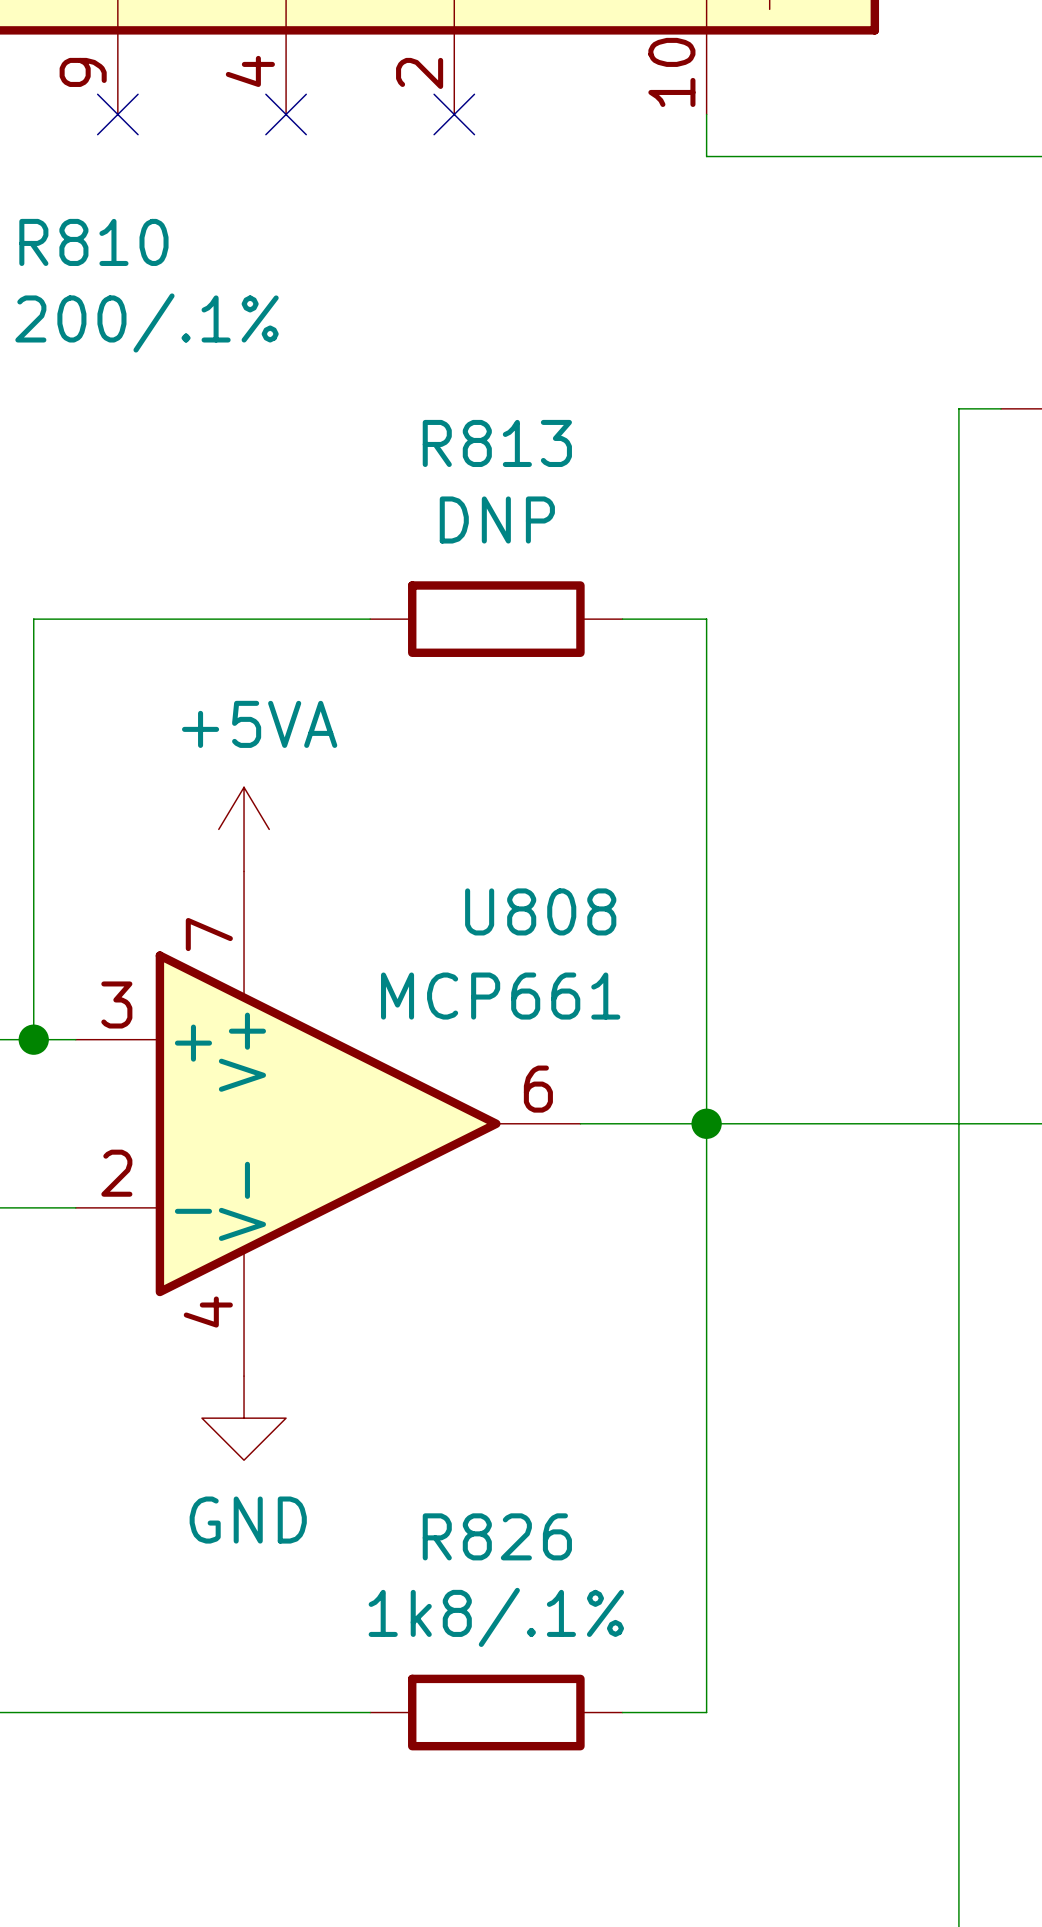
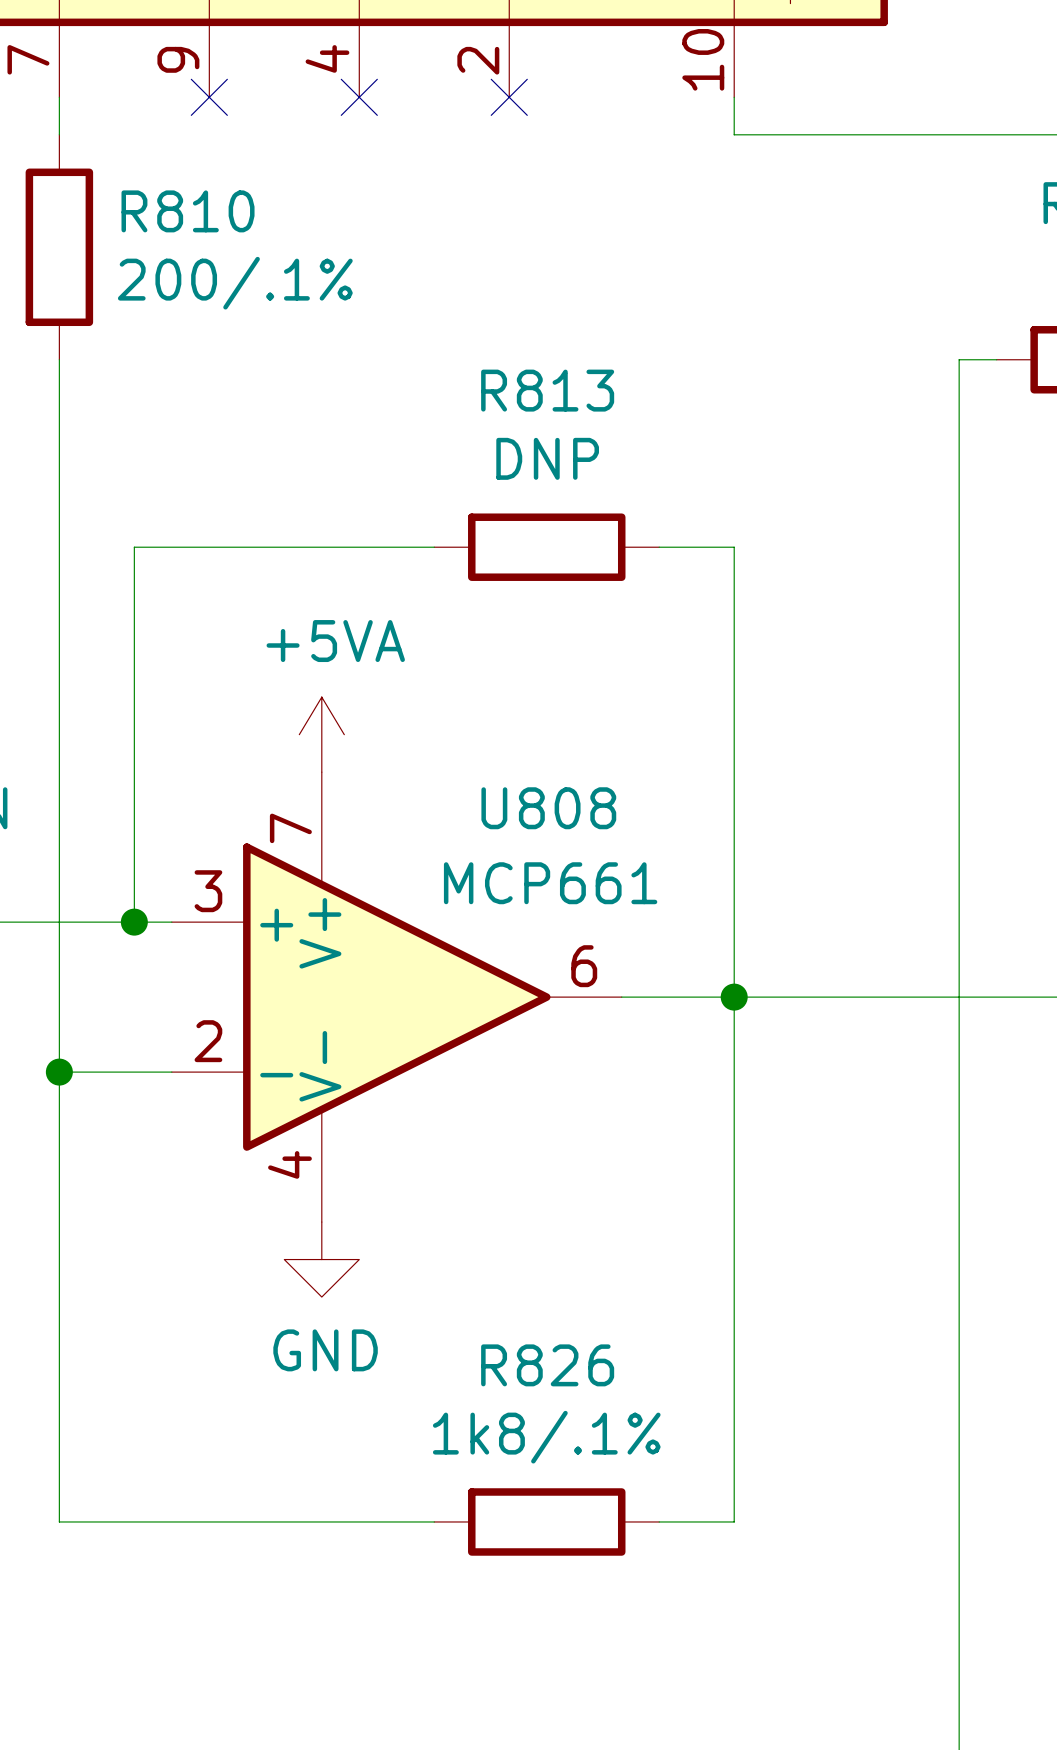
U808 name position: U808 (540, 911) -> U808 (548, 808)

